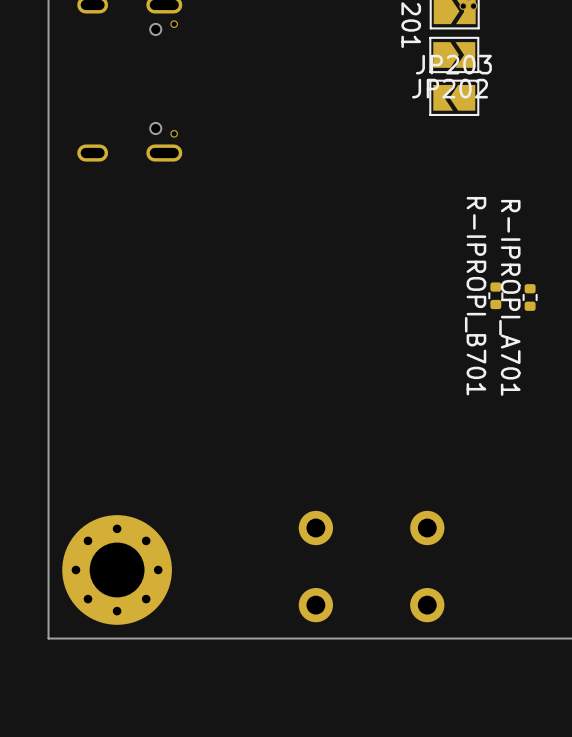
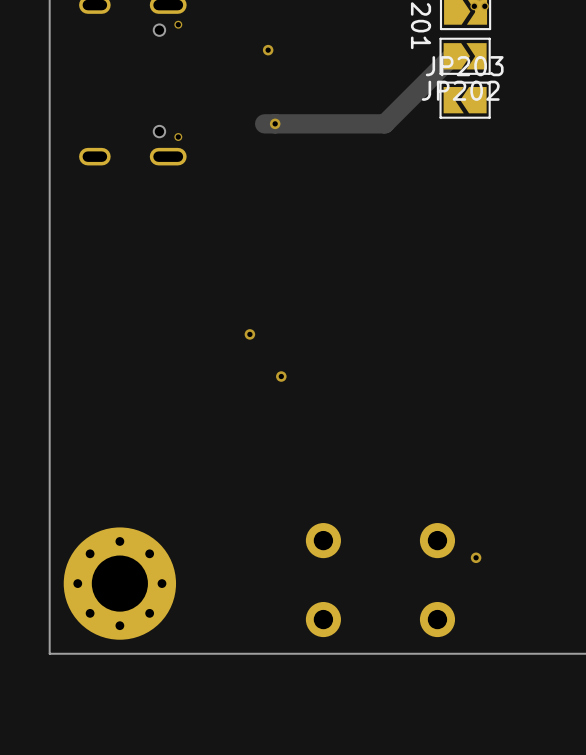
via: none -> (268, 50)
track: none -> (452, 56) (384, 123) (264, 123)
via: none -> (275, 123)
R-IPROPI_B701: (495, 295) -> none
R-IPROPI_A701: (530, 297) -> none
via: none -> (249, 334)
via: none -> (281, 376)
via: none -> (476, 557)

